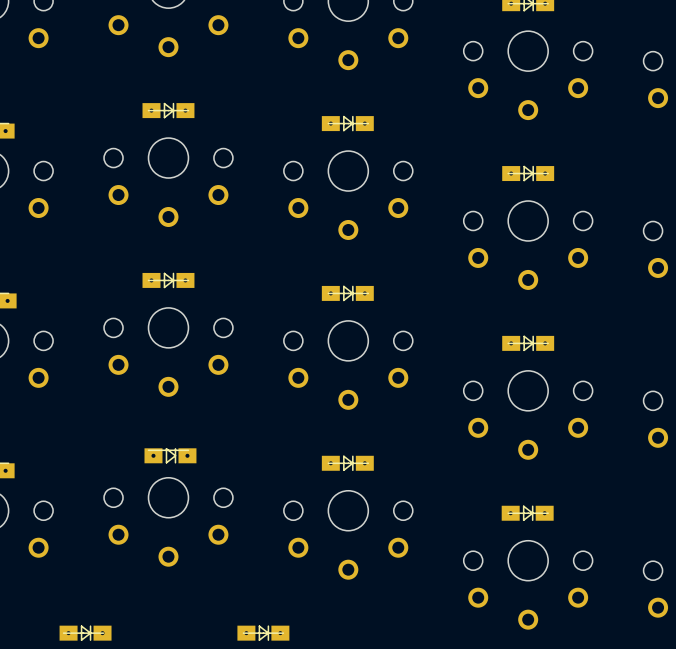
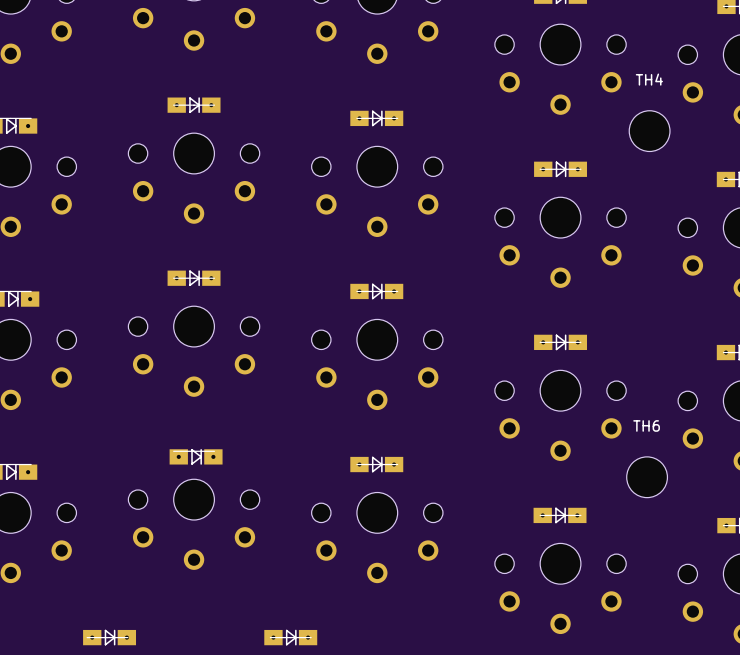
TH4: none -> (649, 131)
TH6: none -> (647, 477)

